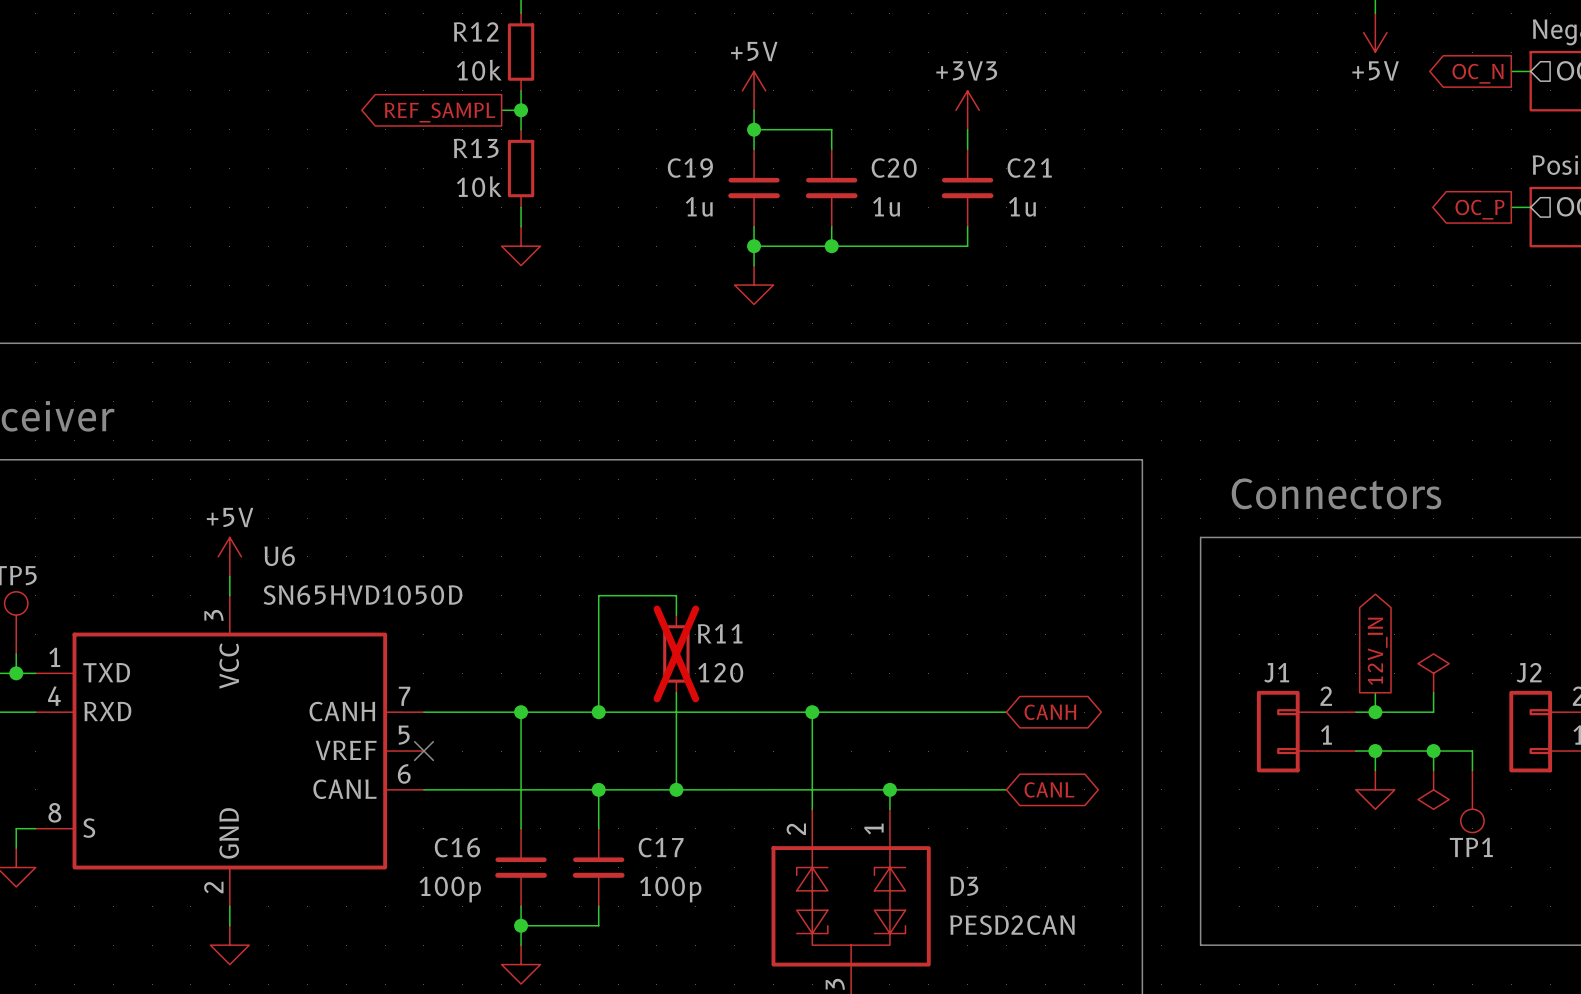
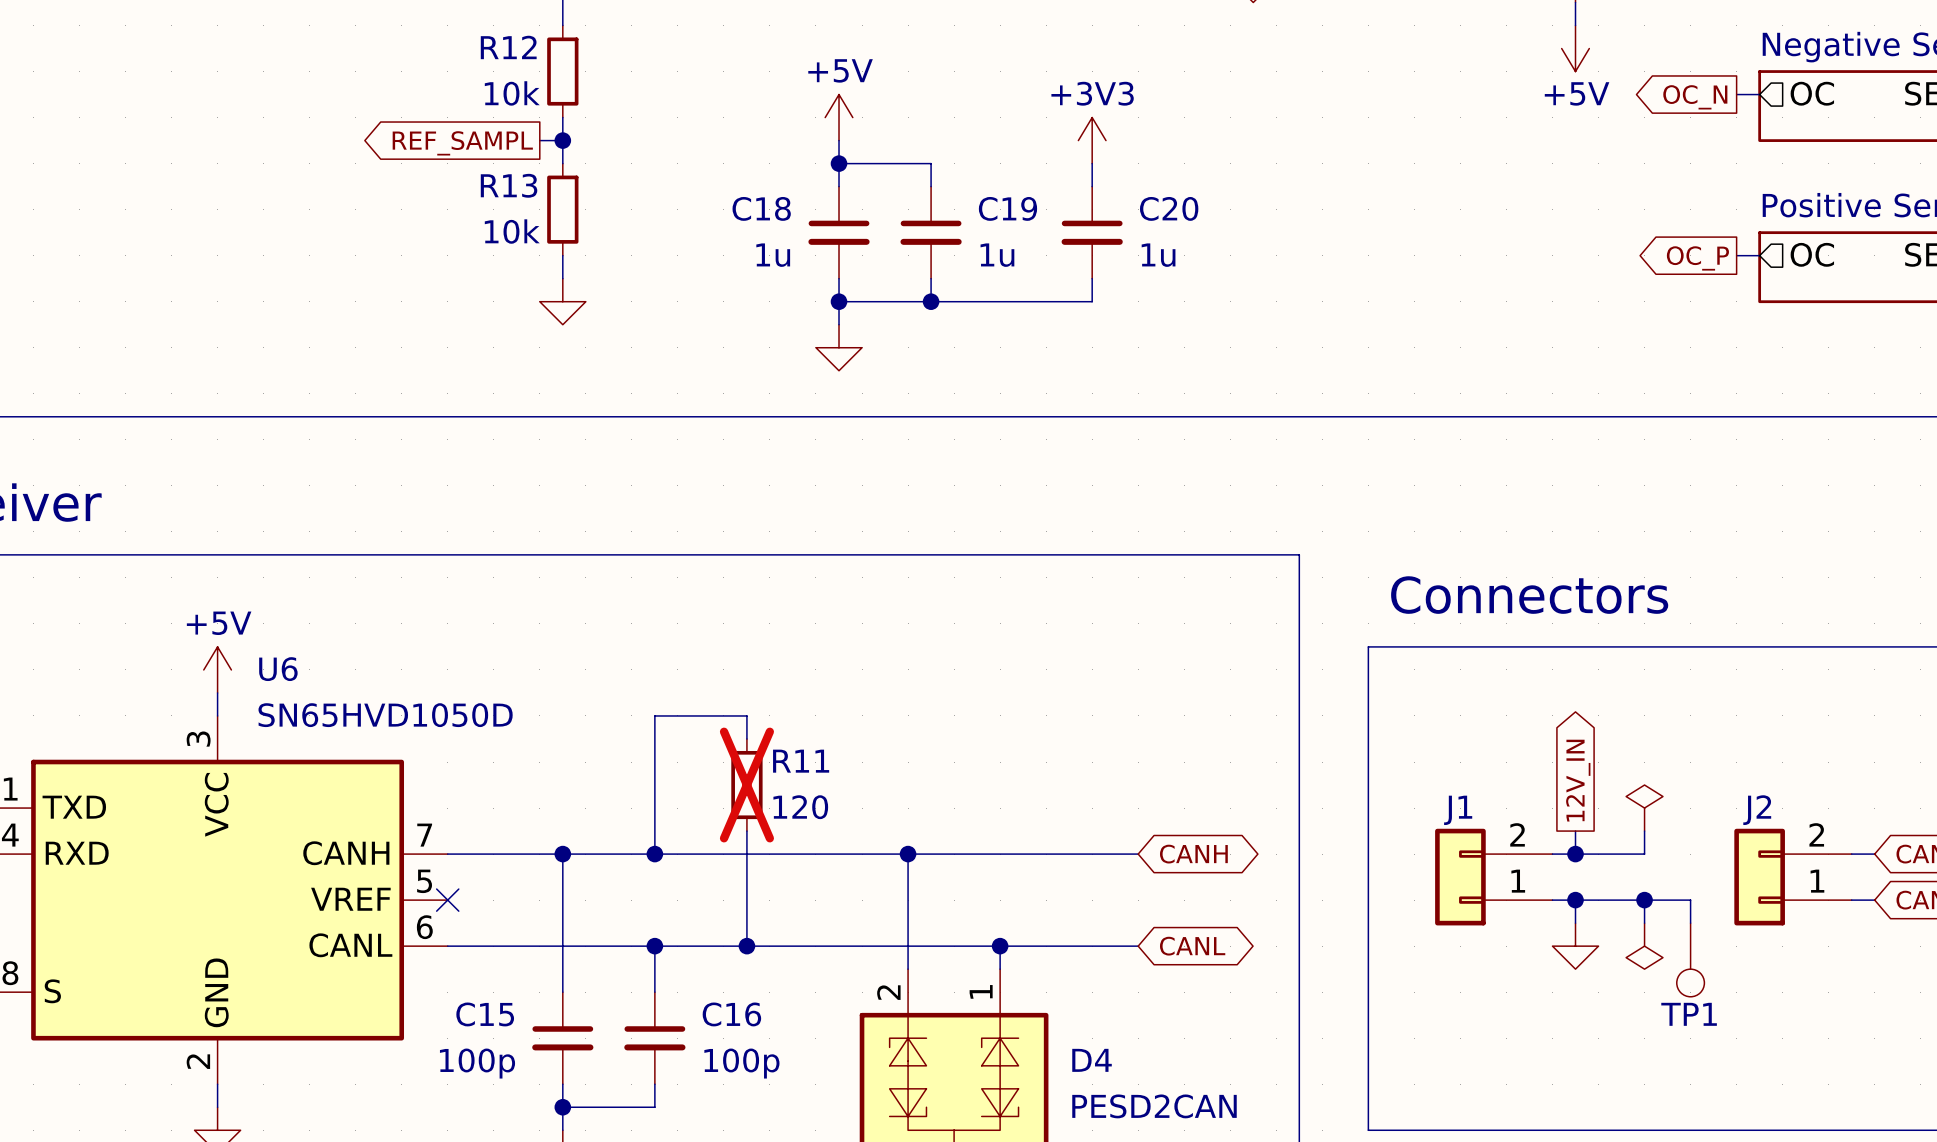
C19 name: C19 (690, 168) -> C18 (761, 208)
C20 name: C20 (894, 168) -> C19 (1007, 208)
C21 name: C21 (1029, 168) -> C20 (1169, 208)
C16 name: C16 (457, 847) -> C15 (485, 1014)
C17 name: C17 (661, 847) -> C16 (731, 1014)
D3 name: D3 (964, 886) -> D4 (1092, 1060)

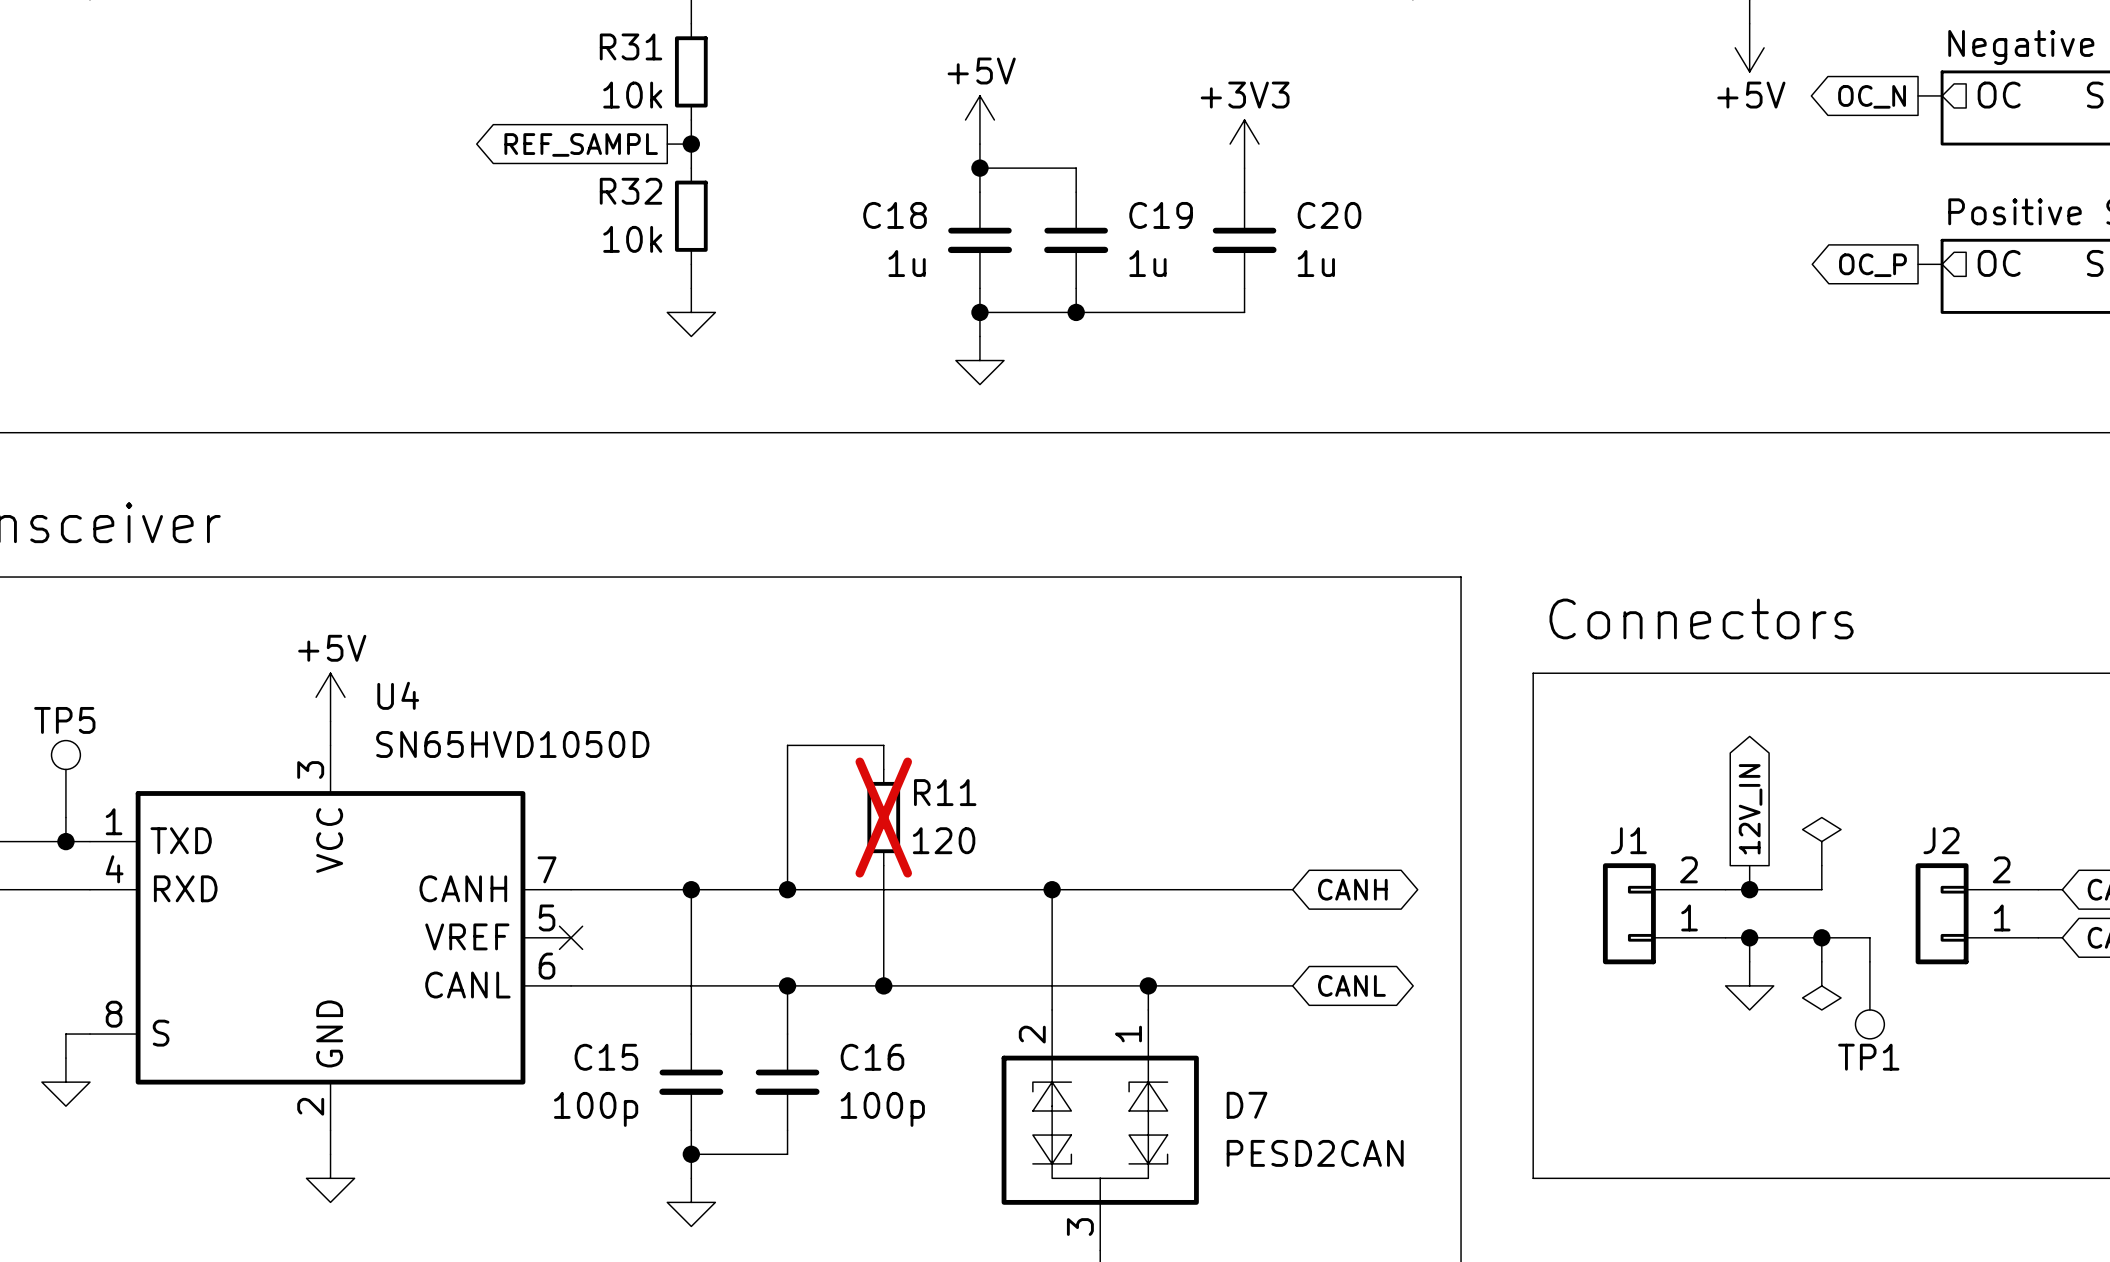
R12 name: R12 (508, 47) -> R31 (631, 46)
R13 name: R13 (509, 185) -> R32 (631, 191)
U6 name: U6 (278, 669) -> U4 (398, 695)
D4 name: D4 (1092, 1060) -> D7 (1247, 1105)

